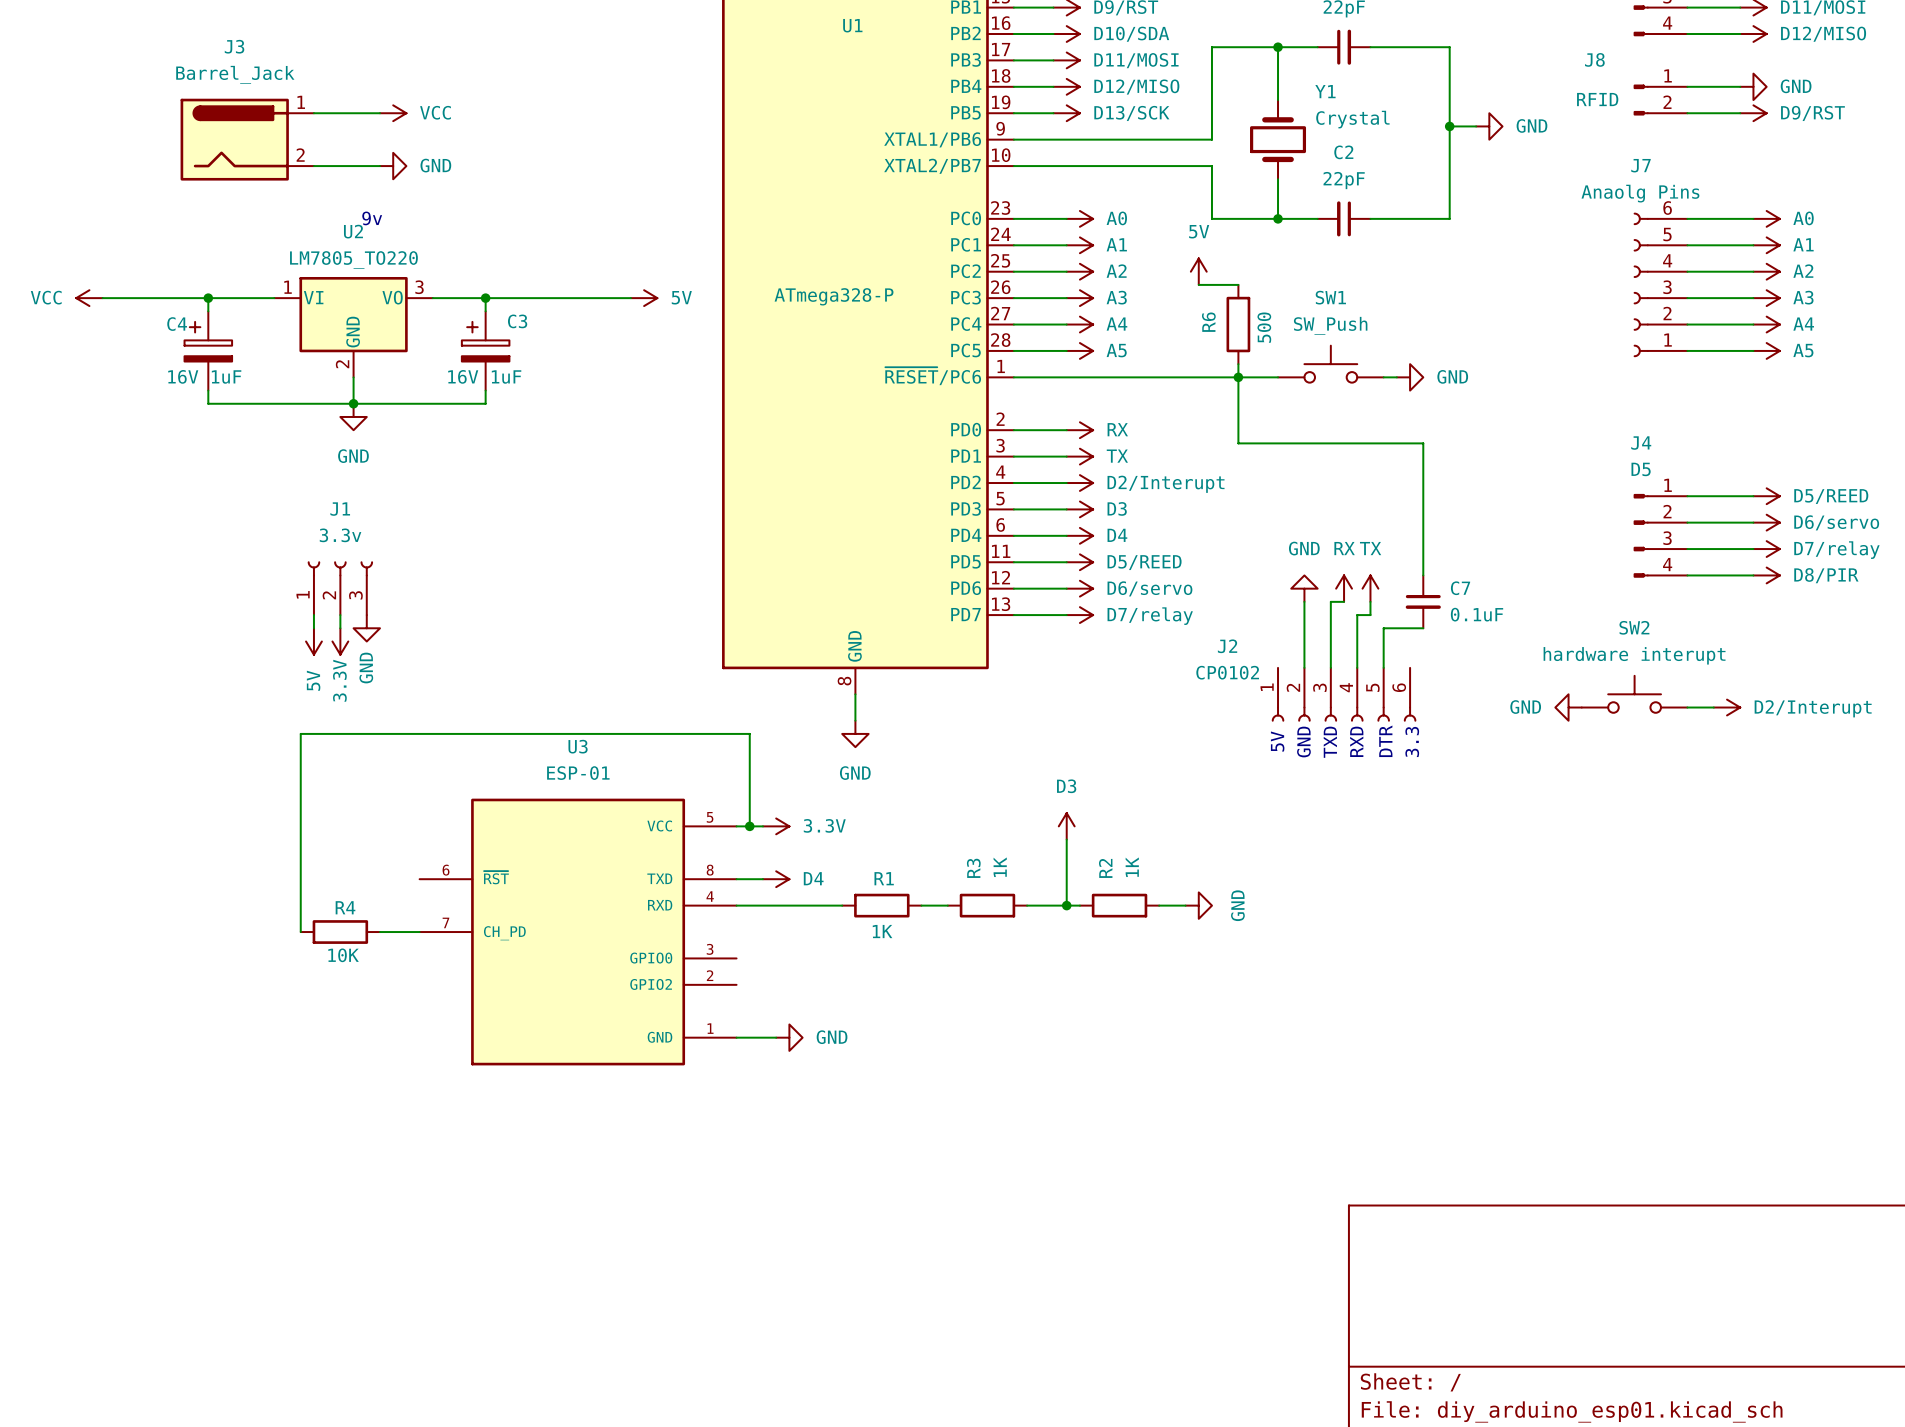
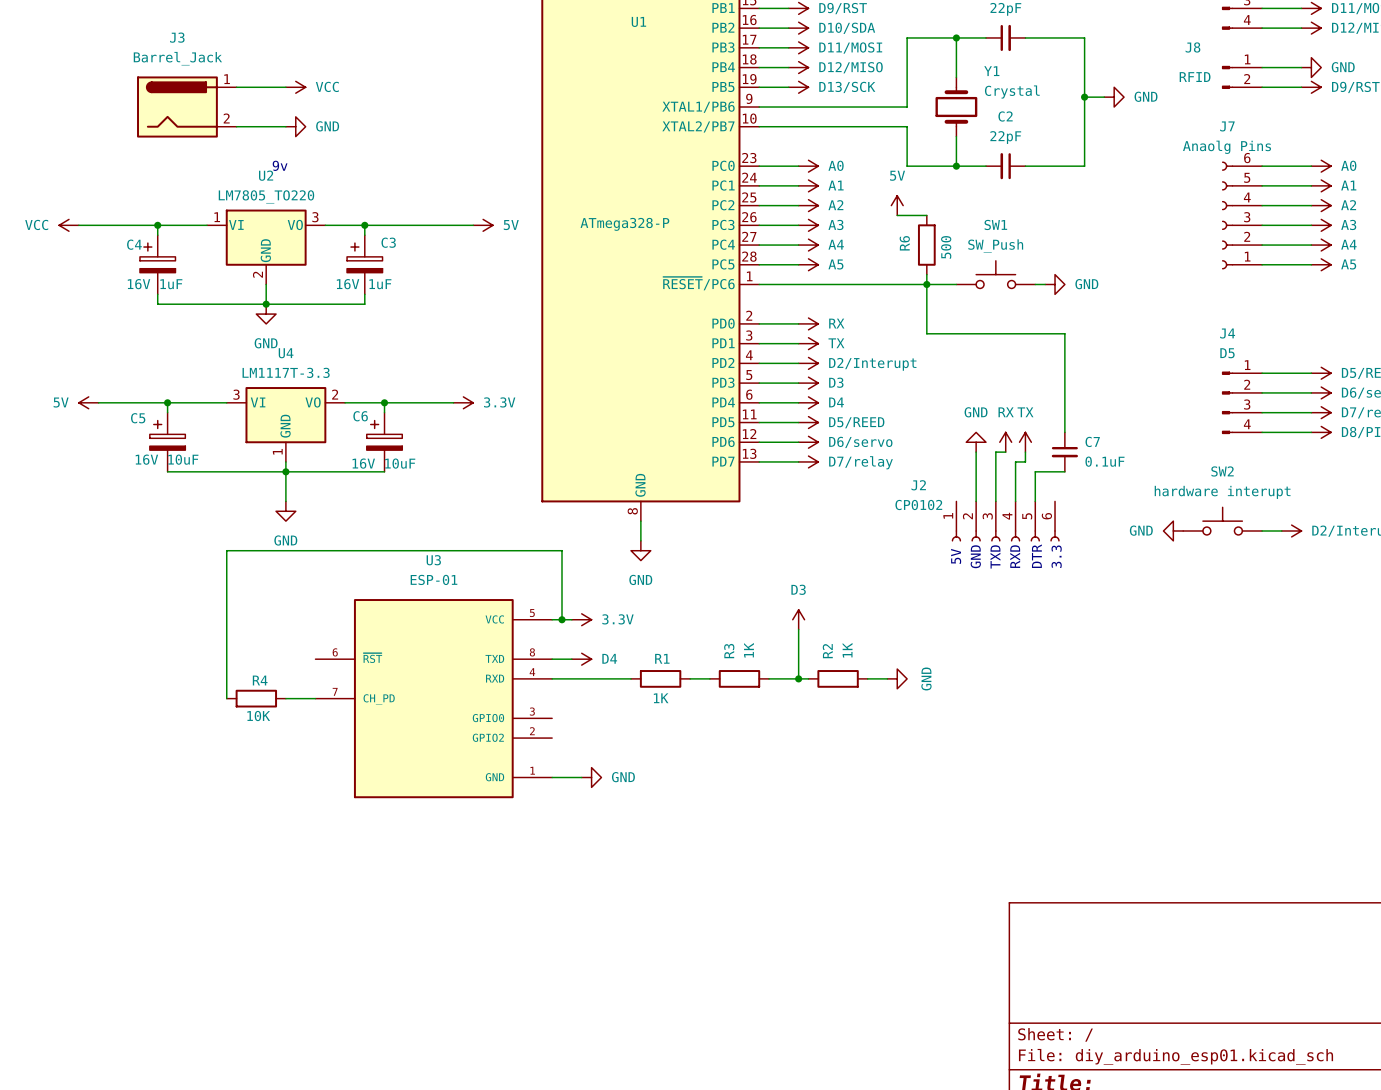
wire: none -> (98, 402) (226, 402)
junction: none -> (167, 402)
wire: none -> (345, 402) (453, 402)
junction: none -> (384, 402)
power symbol: none -> 3.3V (463, 402)
U4: none -> LM1117T-3.3 (285, 424)
C5: none -> 16V 10uF (167, 442)
J1: 3.3v (340, 588) -> none
C6: none -> 16V 10uF (384, 442)
wire: (313, 615) (313, 628) -> (167, 402) (167, 412)
wire: (340, 615) (340, 628) -> (384, 402) (384, 412)
wire: none -> (285, 461) (285, 501)
wire: none -> (167, 471) (384, 471)
power symbol position: GND (366, 628) -> GND (285, 511)
junction: none -> (285, 471)
power symbol rotation: 0° (313, 641) -> 90° clockwise (88, 402)
power symbol position: 5V (313, 641) -> 5V (88, 402)
power symbol: 3.3V (340, 641) -> none
power symbol text rotation: 0° (366, 668) -> 90° clockwise (285, 540)

